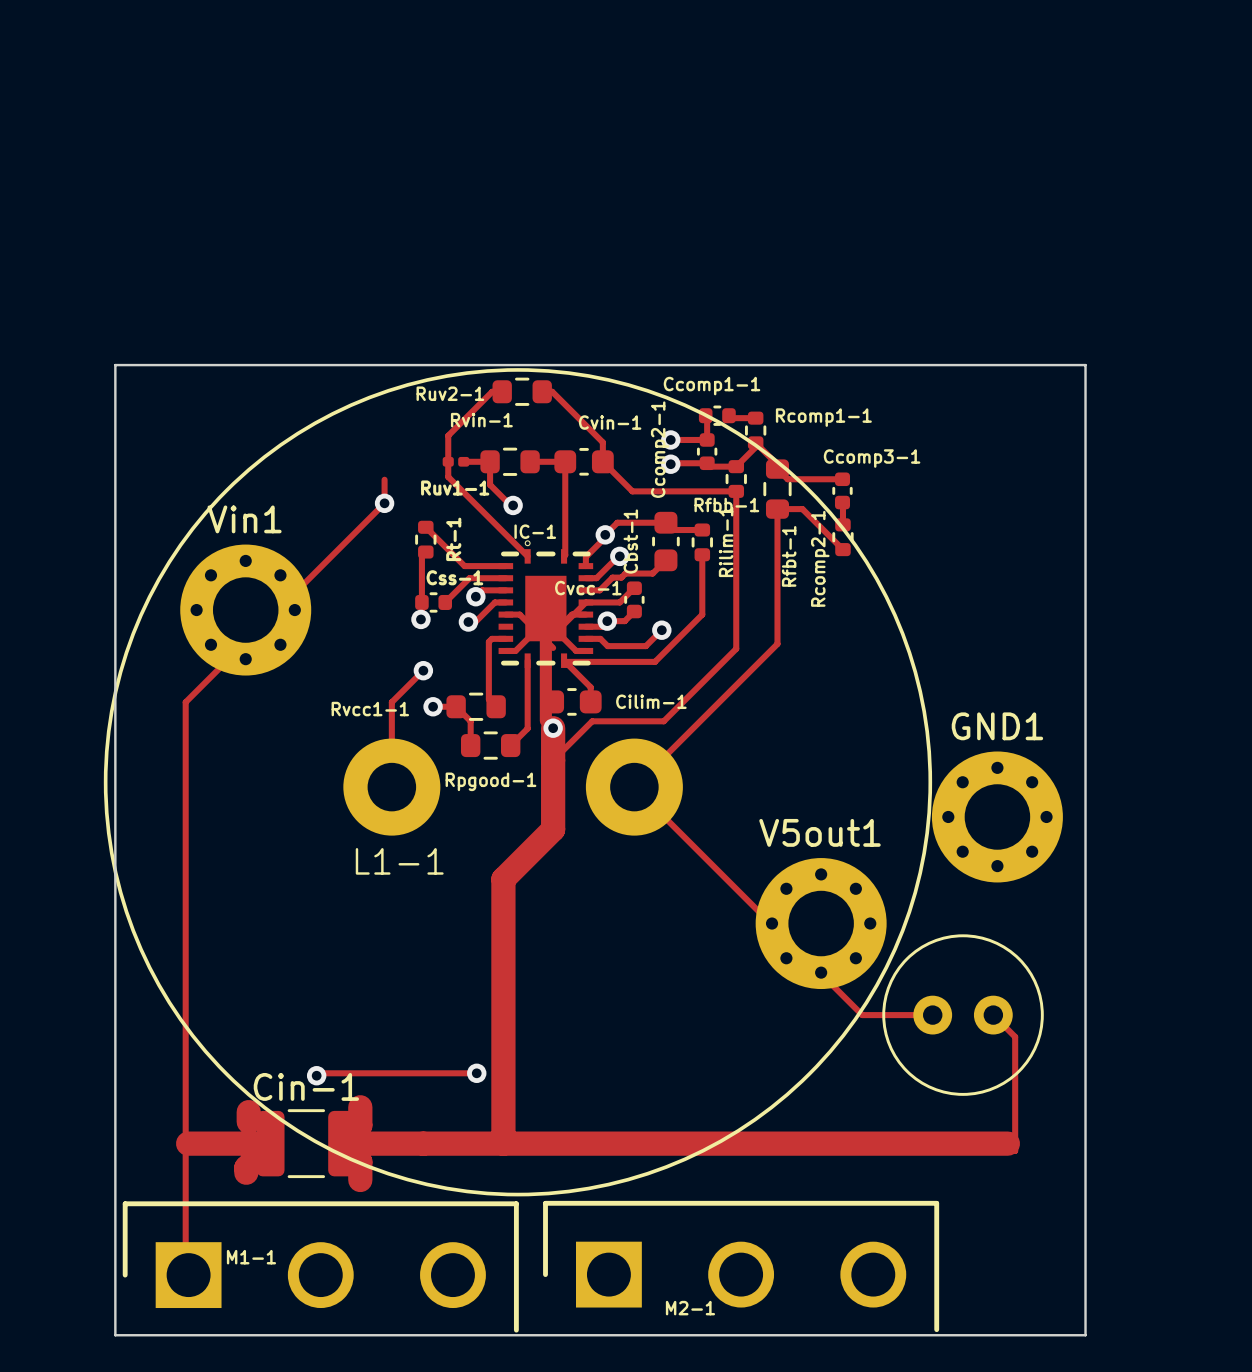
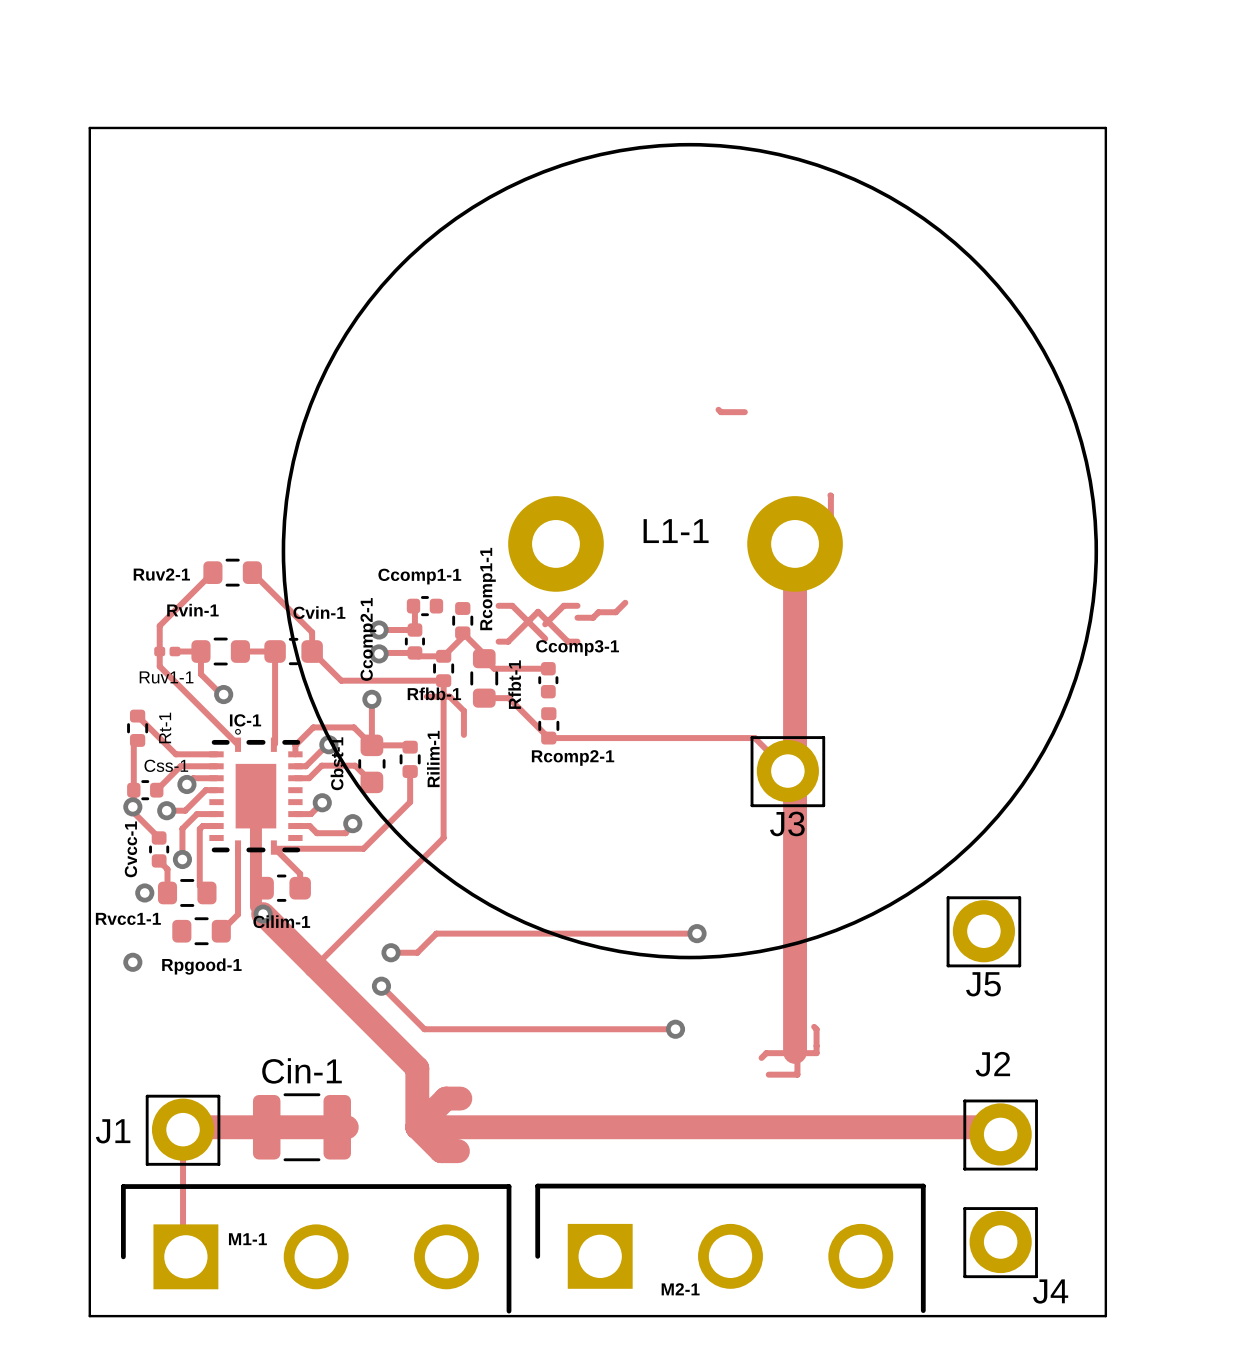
track: (502, 391) (492, 391) (448, 435) (448, 476) (527, 556) -> none
Ruv2-1 position: (522, 391) -> (232, 572)
track: (542, 391) (552, 391) (602, 442) (602, 461) (632, 491) (736, 491) (736, 648) (663, 721) (592, 721) (553, 760) -> none
track: (705, 415) (707, 439) (670, 439) -> (413, 606) (414, 630) (379, 630)
Ccomp1-1 position: (717, 415) -> (424, 606)
Rcomp1-1 name rotation: 0° (823, 417) -> 90° counterclockwise (488, 589)
Rcomp1-1 position: (755, 430) -> (462, 620)
via: (670, 439) -> none
Ccomp2-1 position: (707, 451) -> (414, 641)
Ruv1-1 position: (456, 461) -> (167, 651)
track: (463, 461) (490, 461) (490, 484) (513, 507) (513, 505) (510, 505) -> (175, 651) (200, 651) (200, 674) (223, 696) (223, 694) (221, 694)
Rvin-1 position: (510, 461) -> (220, 651)
track: (530, 461) (565, 461) (564, 556) -> (240, 651) (275, 651) (273, 744)
Cvin-1 position: (584, 461) -> (293, 651)
track: (674, 463) (670, 464) (707, 463) (710, 466) (736, 466) (755, 447) (755, 442) (777, 464) (777, 469) (787, 479) (842, 479) -> (382, 652) (379, 653) (414, 652) (418, 656) (443, 656) (462, 637) (462, 632) (484, 654) (484, 658) (494, 668) (548, 668)
via: (670, 464) -> none
track: (384, 479) (384, 503) (185, 702) (185, 1146) -> none
Rfbb-1 position: (736, 479) -> (443, 668)
Rfbt-1 position: (777, 489) -> (484, 678)
Ccomp3-1 position: (842, 490) -> (548, 680)
via: (384, 503) -> none
via: (513, 505) -> none
track: (425, 527) (464, 566) (505, 566) -> (137, 716) (175, 754) (216, 754)
track: (702, 530) (673, 530) (665, 522) (617, 522) (605, 534) -> none
via: (605, 534) -> none
Rcomp2-1 position: (842, 537) -> (548, 725)
track: (604, 538) (585, 556) (585, 566) -> none
Rt-1 position: (425, 539) -> (137, 728)
Cbst-1 position: (665, 541) -> (371, 763)
Rilim-1 position: (702, 542) -> (410, 759)
track: (842, 549) (802, 509) (777, 509) (777, 644) (634, 787) (862, 1015) (932, 1015) -> none
track: none -> (795, 543) (795, 1051)
track: (425, 552) (421, 555) (421, 625) -> none
track: (702, 554) (702, 614) (655, 661) (565, 661) -> none
track: (618, 556) (619, 554) (596, 578) (585, 578) -> (327, 744) (328, 743) (305, 766) (295, 766)
via: (619, 556) -> none
Rfbt-1 name position: Rfbt-1 (789, 556) -> Rfbt-1 (514, 684)
Rcomp2-1 name rotation: 0° (820, 558) -> 90° clockwise (573, 757)
track: (665, 560) (652, 573) (625, 573) (621, 577) (612, 577) (599, 590) (585, 590) -> none
track: (505, 578) (469, 578) (445, 602) -> (216, 766) (180, 766) (156, 790)
track: none -> (212, 572) (159, 625) (159, 666) (238, 744)
track: none -> (252, 572) (312, 632) (312, 651) (341, 680) (443, 680) (443, 837) (315, 966)
Cvcc-1 name rotation: 0° (588, 588) -> 90° counterclockwise (130, 849)
track: (634, 588) (619, 602) (585, 602) (553, 635) -> none
track: (505, 590) (482, 590) (475, 596) -> (216, 778) (193, 778) (186, 784)
via: (475, 596) -> none
Cvcc-1 position: (634, 599) -> (159, 849)
Css-1 position: (433, 602) -> (145, 790)
track: (505, 602) (494, 602) (474, 623) -> none
IC-1 position: (545, 604) -> (255, 791)
Vin1: (245, 610) -> none
via: (420, 619) -> none
track: (545, 620) (545, 720) (553, 728) (553, 829) (503, 879) (503, 1143) -> none
via: (607, 621) -> none
via: (468, 622) -> none
track: (661, 630) (645, 646) (607, 646) (600, 638) (585, 638) -> none
via: (661, 630) -> none
track: (505, 638) (491, 638) (488, 641) (488, 699) (496, 706) -> (216, 826) (202, 826) (199, 829) (199, 885) (206, 892)
via: none -> (379, 630)
track: (527, 660) (527, 728) (510, 745) -> (238, 847) (238, 914) (221, 931)
track: (564, 660) (590, 687) (590, 701) -> (273, 847) (300, 873) (300, 888)
via: none -> (379, 653)
track: (423, 670) (391, 702) (391, 787) -> none
via: (423, 670) -> none
Cilim-1 position: (571, 701) -> (281, 888)
Cilim-1 name position: Cilim-1 (651, 701) -> Cilim-1 (281, 921)
via: none -> (223, 694)
via: (433, 706) -> none
Rvcc1-1 position: (476, 706) -> (187, 892)
track: none -> (484, 698) (508, 698) (548, 738) (754, 738) (787, 771)
Rvcc1-1 name position: Rvcc1-1 (370, 709) -> Rvcc1-1 (128, 918)
track: none -> (371, 699) (371, 745)
via: none -> (371, 699)
via: (553, 728) -> none
Rpgood-1 position: (490, 745) -> (201, 931)
track: none -> (137, 740) (133, 744) (133, 812) (159, 837)
via: none -> (328, 744)
track: none -> (371, 745) (353, 727) (313, 727) (295, 745) (295, 754)
track: none -> (371, 745) (408, 745) (410, 747)
track: none -> (410, 771) (410, 802) (363, 848) (275, 848)
drawing position: (517, 782) -> (689, 551)
J3: none -> (787, 771)
L1-1 position: (513, 787) -> (675, 543)
track: none -> (295, 778) (309, 778) (321, 765) (355, 765) (371, 782)
via: none -> (186, 784)
track: none -> (216, 790) (205, 790) (185, 810) (166, 810) (168, 809)
track: none -> (322, 802) (310, 814) (295, 814)
via: none -> (322, 802)
GND1: (997, 816) -> none
via: none -> (132, 806)
track: none -> (255, 808) (255, 906) (417, 1068) (417, 1127)
via: none -> (166, 810)
track: none -> (216, 814) (197, 814) (182, 828) (182, 859) (180, 857)
via: none -> (352, 823)
track: none -> (295, 826) (309, 826) (316, 833) (345, 833) (352, 823) (350, 828)
L1-1 name position: L1-1 (399, 861) -> L1-1 (676, 531)
via: none -> (182, 859)
track: none -> (159, 860) (167, 869) (167, 892)
via: none -> (144, 892)
V5out1: (821, 923) -> none
via: none -> (263, 914)
J5: none -> (983, 931)
track: none -> (697, 933) (436, 933) (417, 952) (391, 952)
via: none -> (697, 933)
via: none -> (391, 952)
via: none -> (132, 962)
track: none -> (381, 986) (424, 1029) (675, 1029)
via: none -> (381, 986)
part: (963, 1015) -> none
track: (993, 1015) (1015, 1036) (1015, 1150) -> none
track: none -> (814, 1026) (816, 1029) (816, 1053) (766, 1053) (761, 1057)
via: none -> (675, 1029)
track: none -> (796, 1053) (797, 1074) (768, 1074)
track: (476, 1073) (319, 1073) (316, 1075) -> none
via: (476, 1073) -> none
via: (316, 1075) -> none
track: (360, 1107) (360, 1125) (342, 1143) (360, 1161) (360, 1180) -> none
track: (248, 1112) (248, 1121) -> none
track: none -> (460, 1098) (446, 1098) (417, 1127)
track: (270, 1143) (246, 1167) (246, 1172) -> (266, 1127) (337, 1127)
track: (351, 1143) (423, 1143) -> (457, 1151) (441, 1151) (417, 1127)
J1: none -> (183, 1130)
J2: none -> (1000, 1135)
J4: none -> (1000, 1242)
board edge: (115, 1335) (115, 365) (1085, 365) (1085, 1335) -> (113, 1316) (89, 1316) (89, 127) (1105, 127) (1105, 1316) (1069, 1316)

